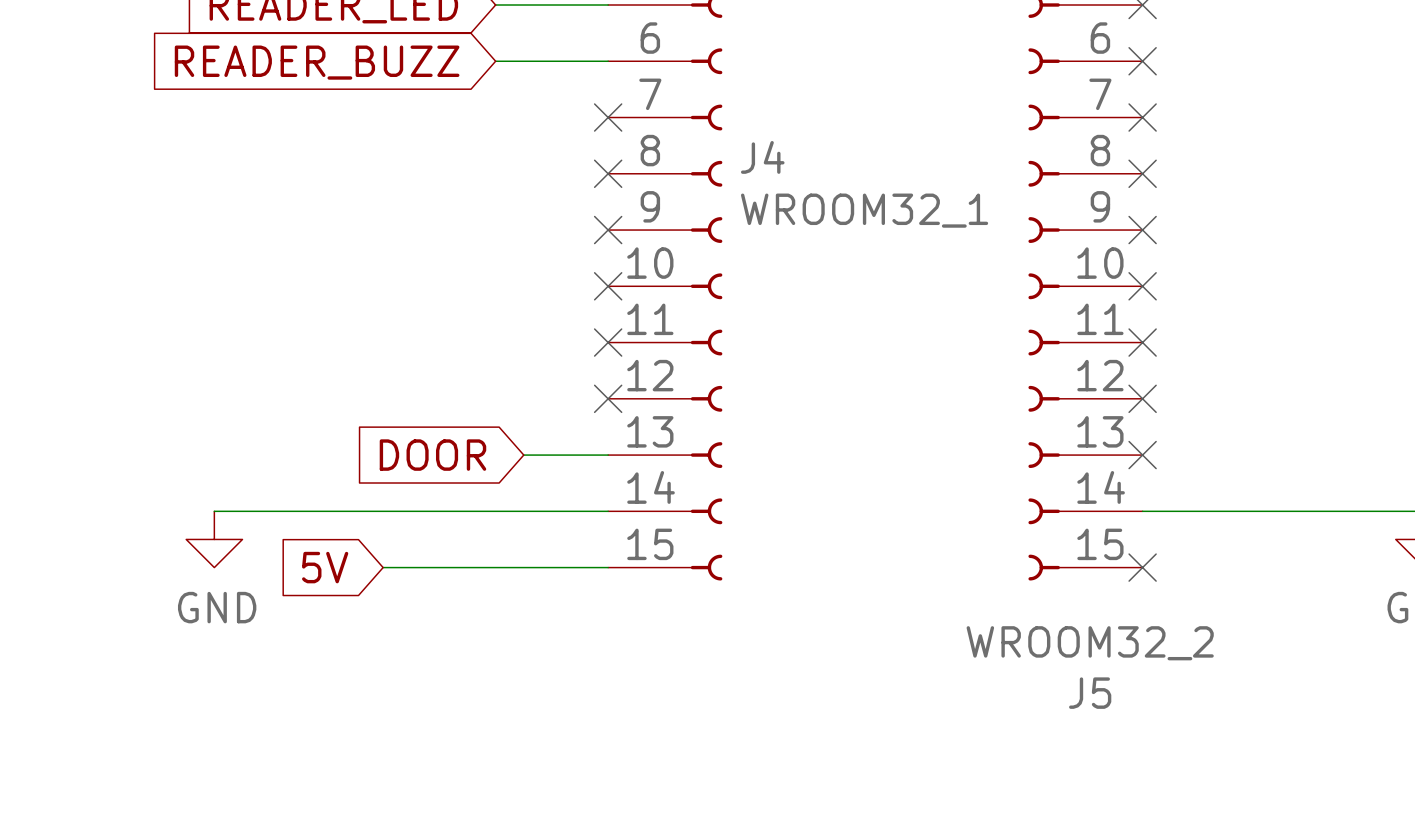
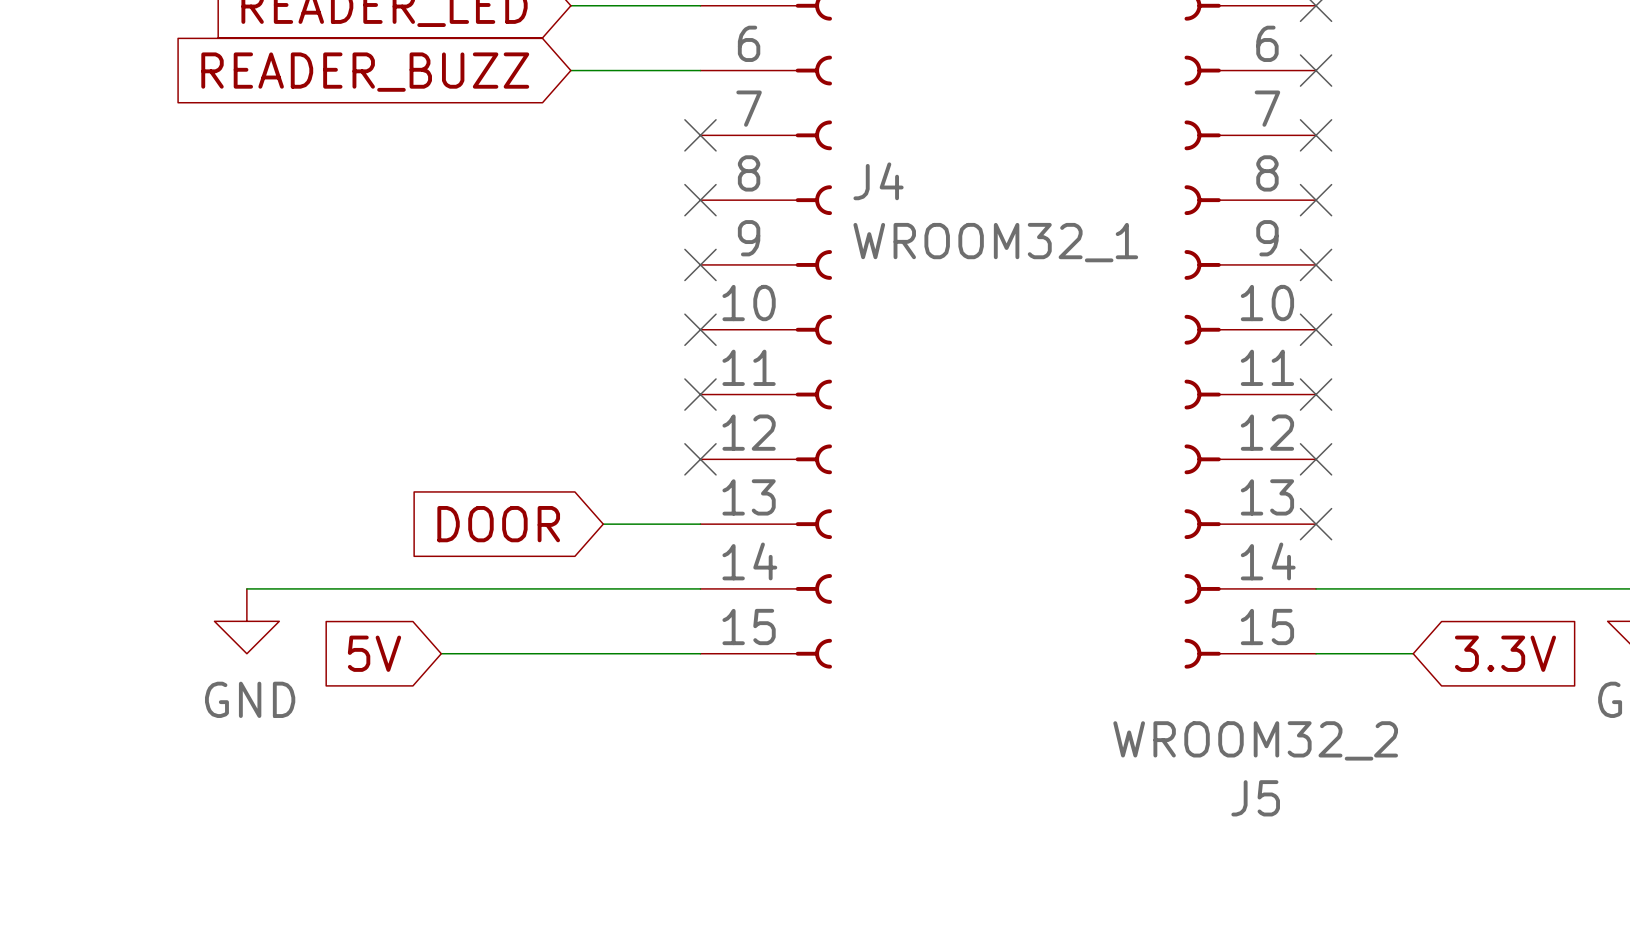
wire: none -> (1316, 653) (1413, 653)
no-connect mark: (1142, 567) -> none
global label: none -> 3.3V (1505, 653)

